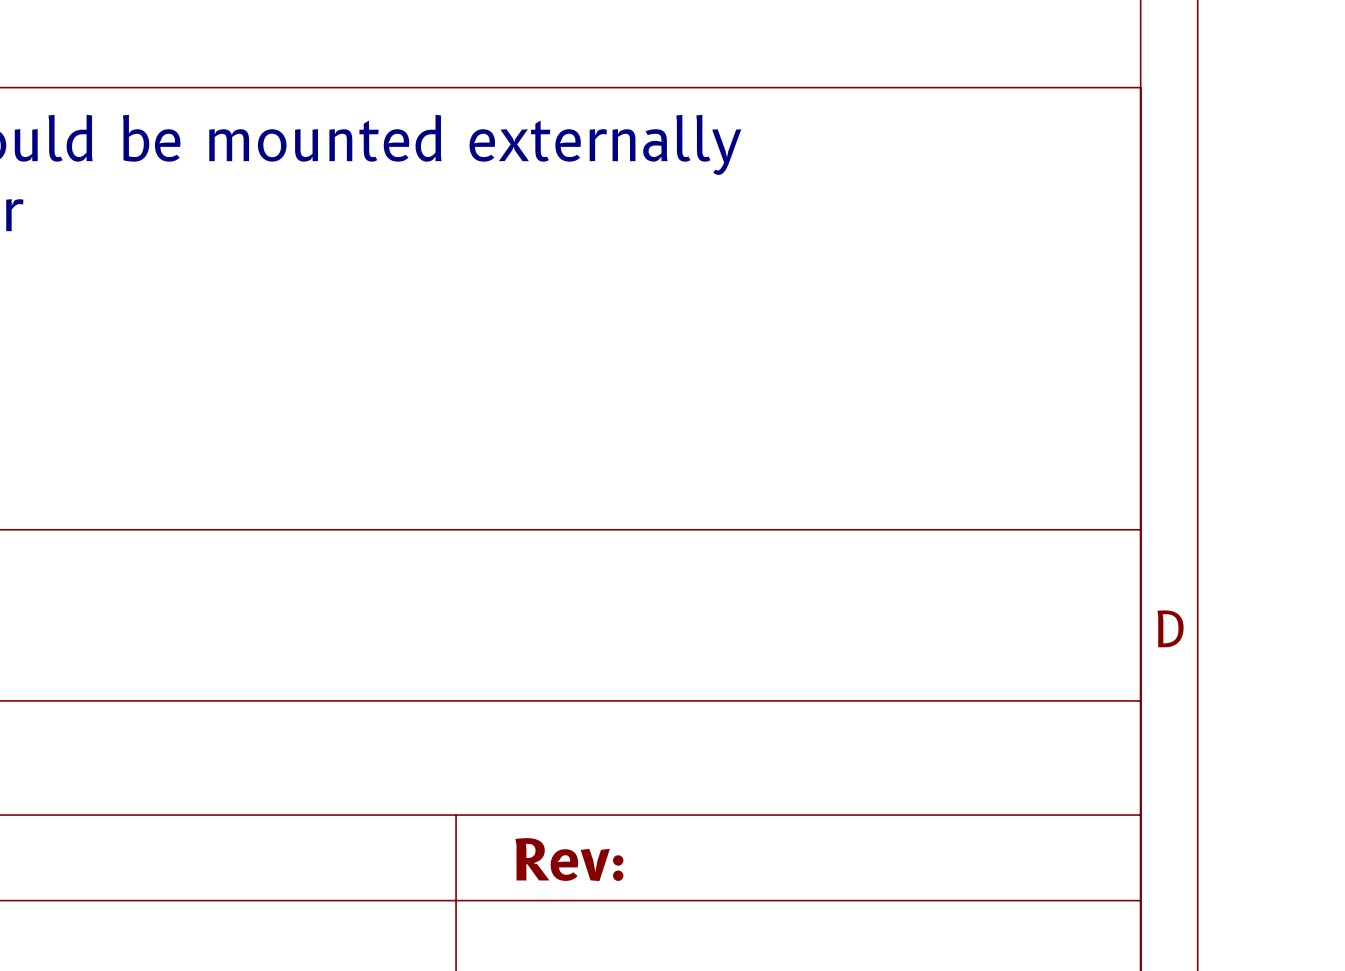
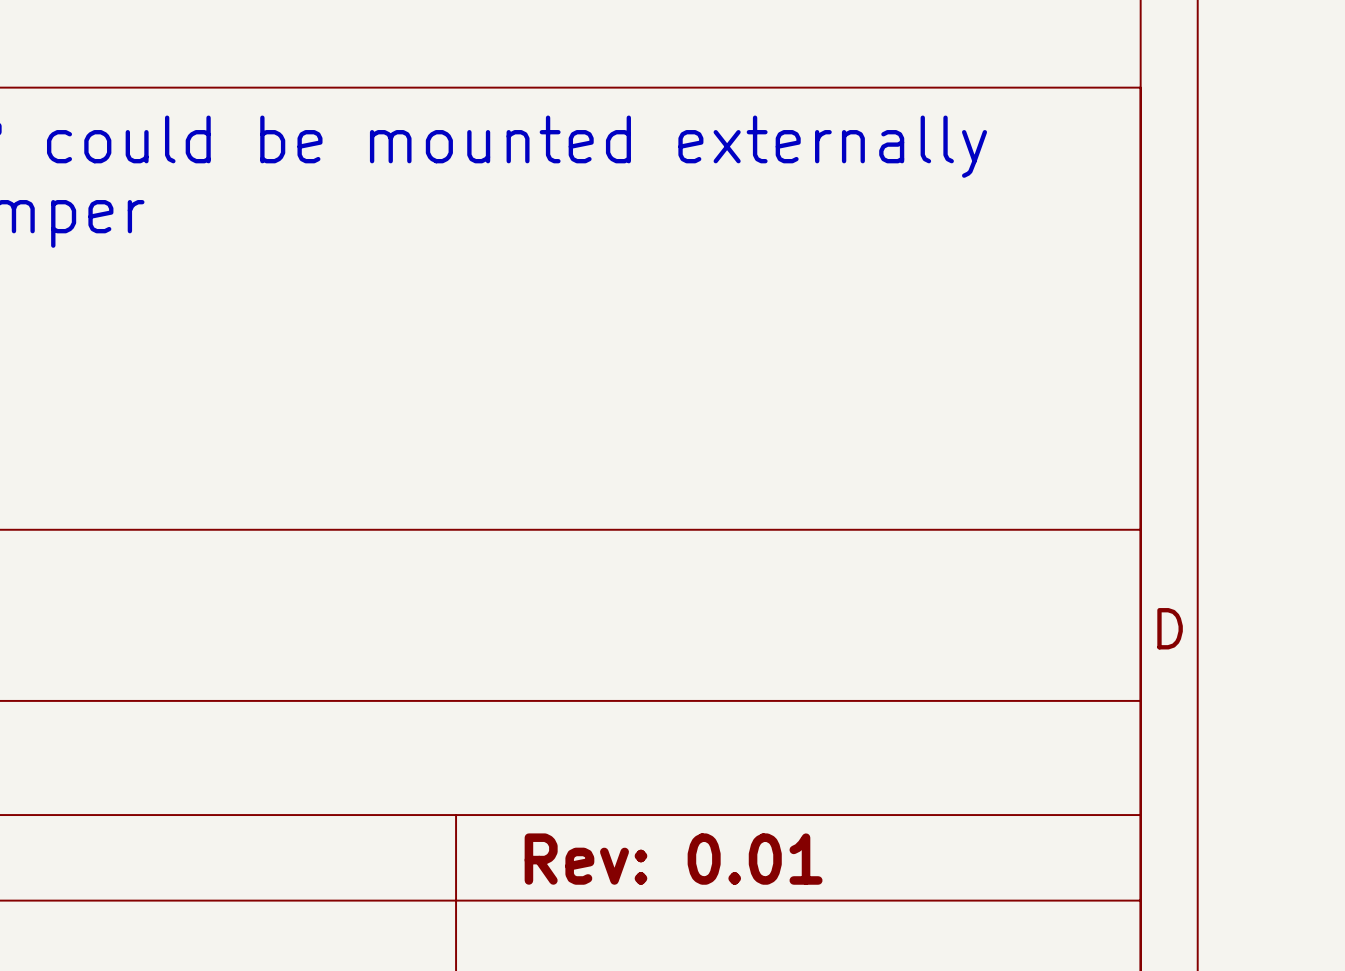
title block: Rev: (569, 859) -> Rev: 0.01 (673, 859)

